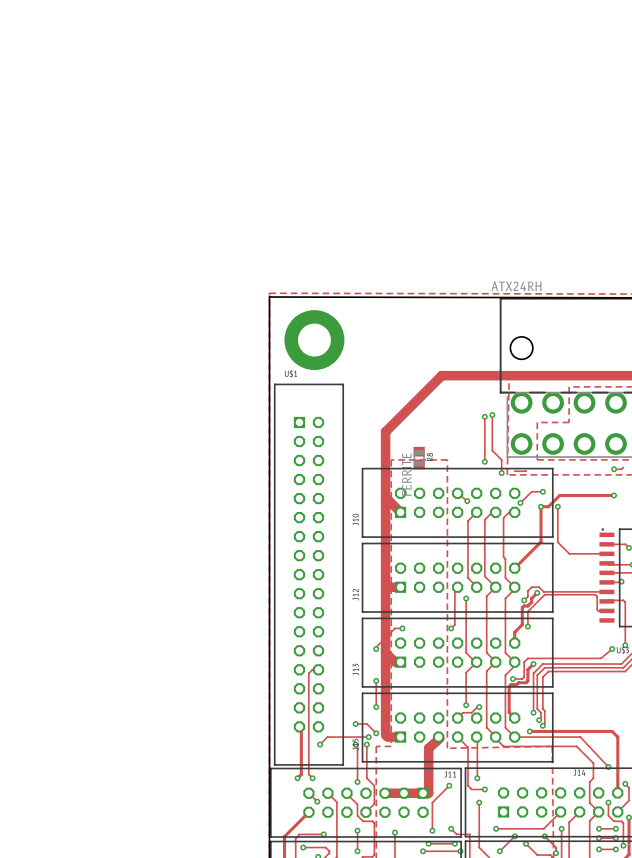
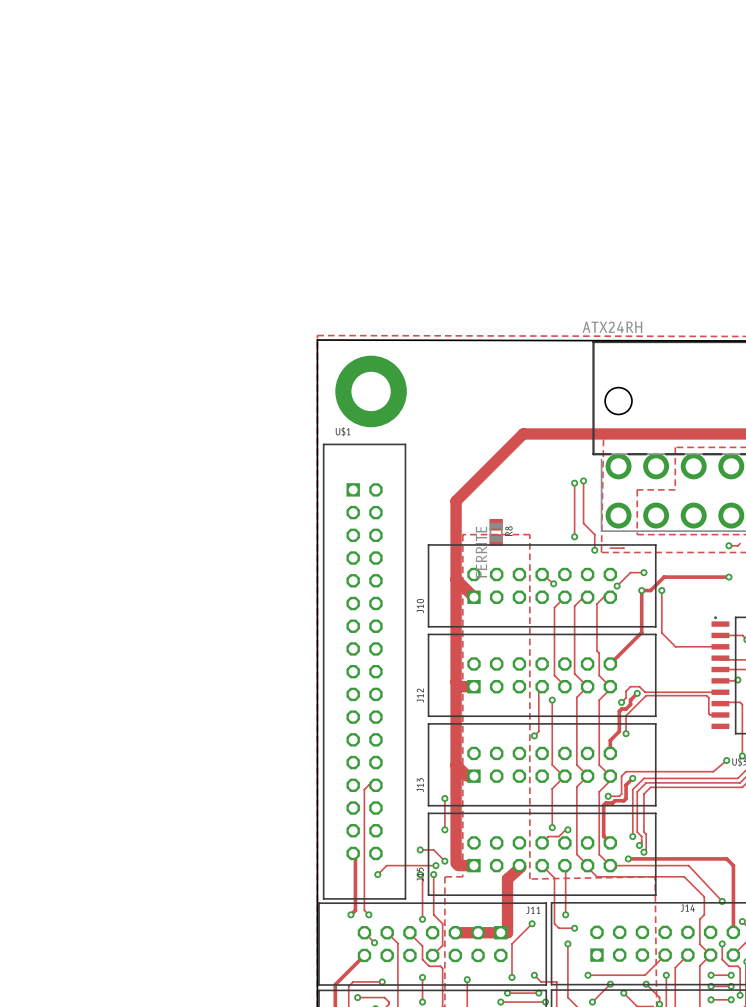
track: (402, 628) (394, 628) (376, 649) -> none
via: (402, 628) -> none
via: (376, 649) -> none

